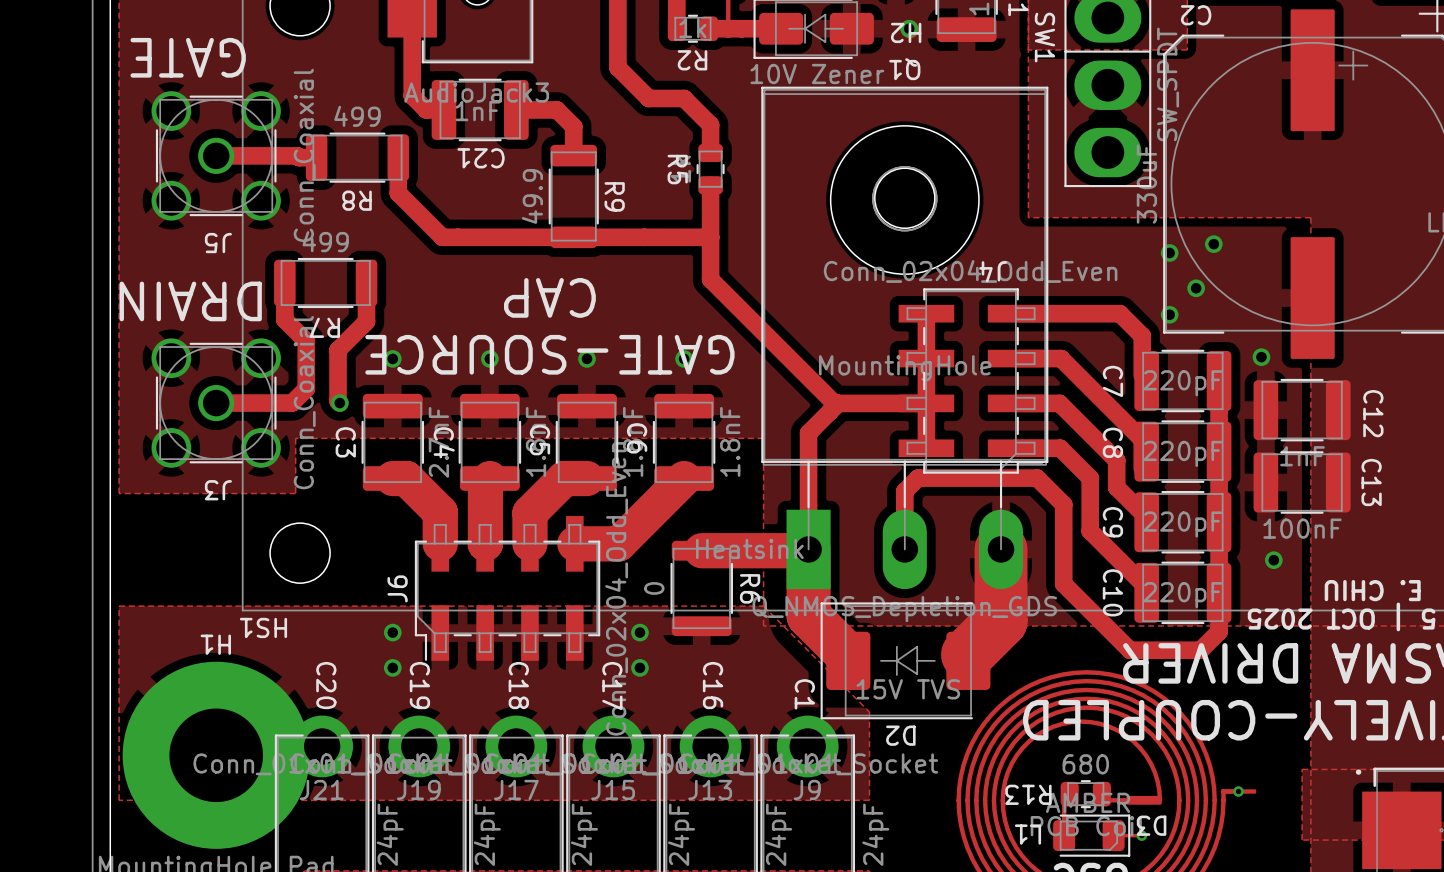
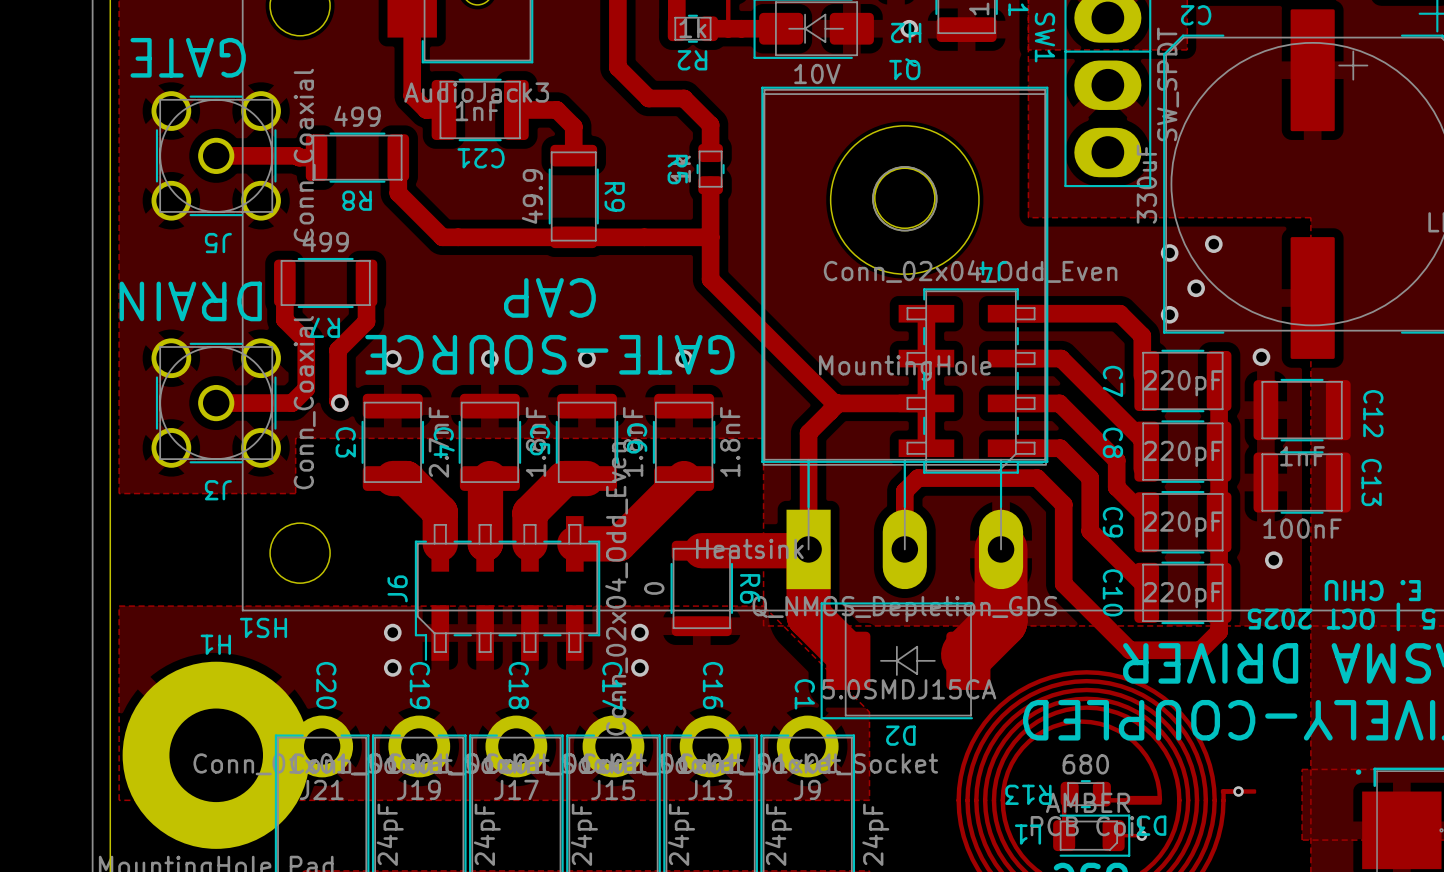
part value: 10V Zener (817, 73) -> 10V (817, 73)
D2 value: 15V TVS (908, 689) -> 5.0SMDJ15CA (909, 689)

